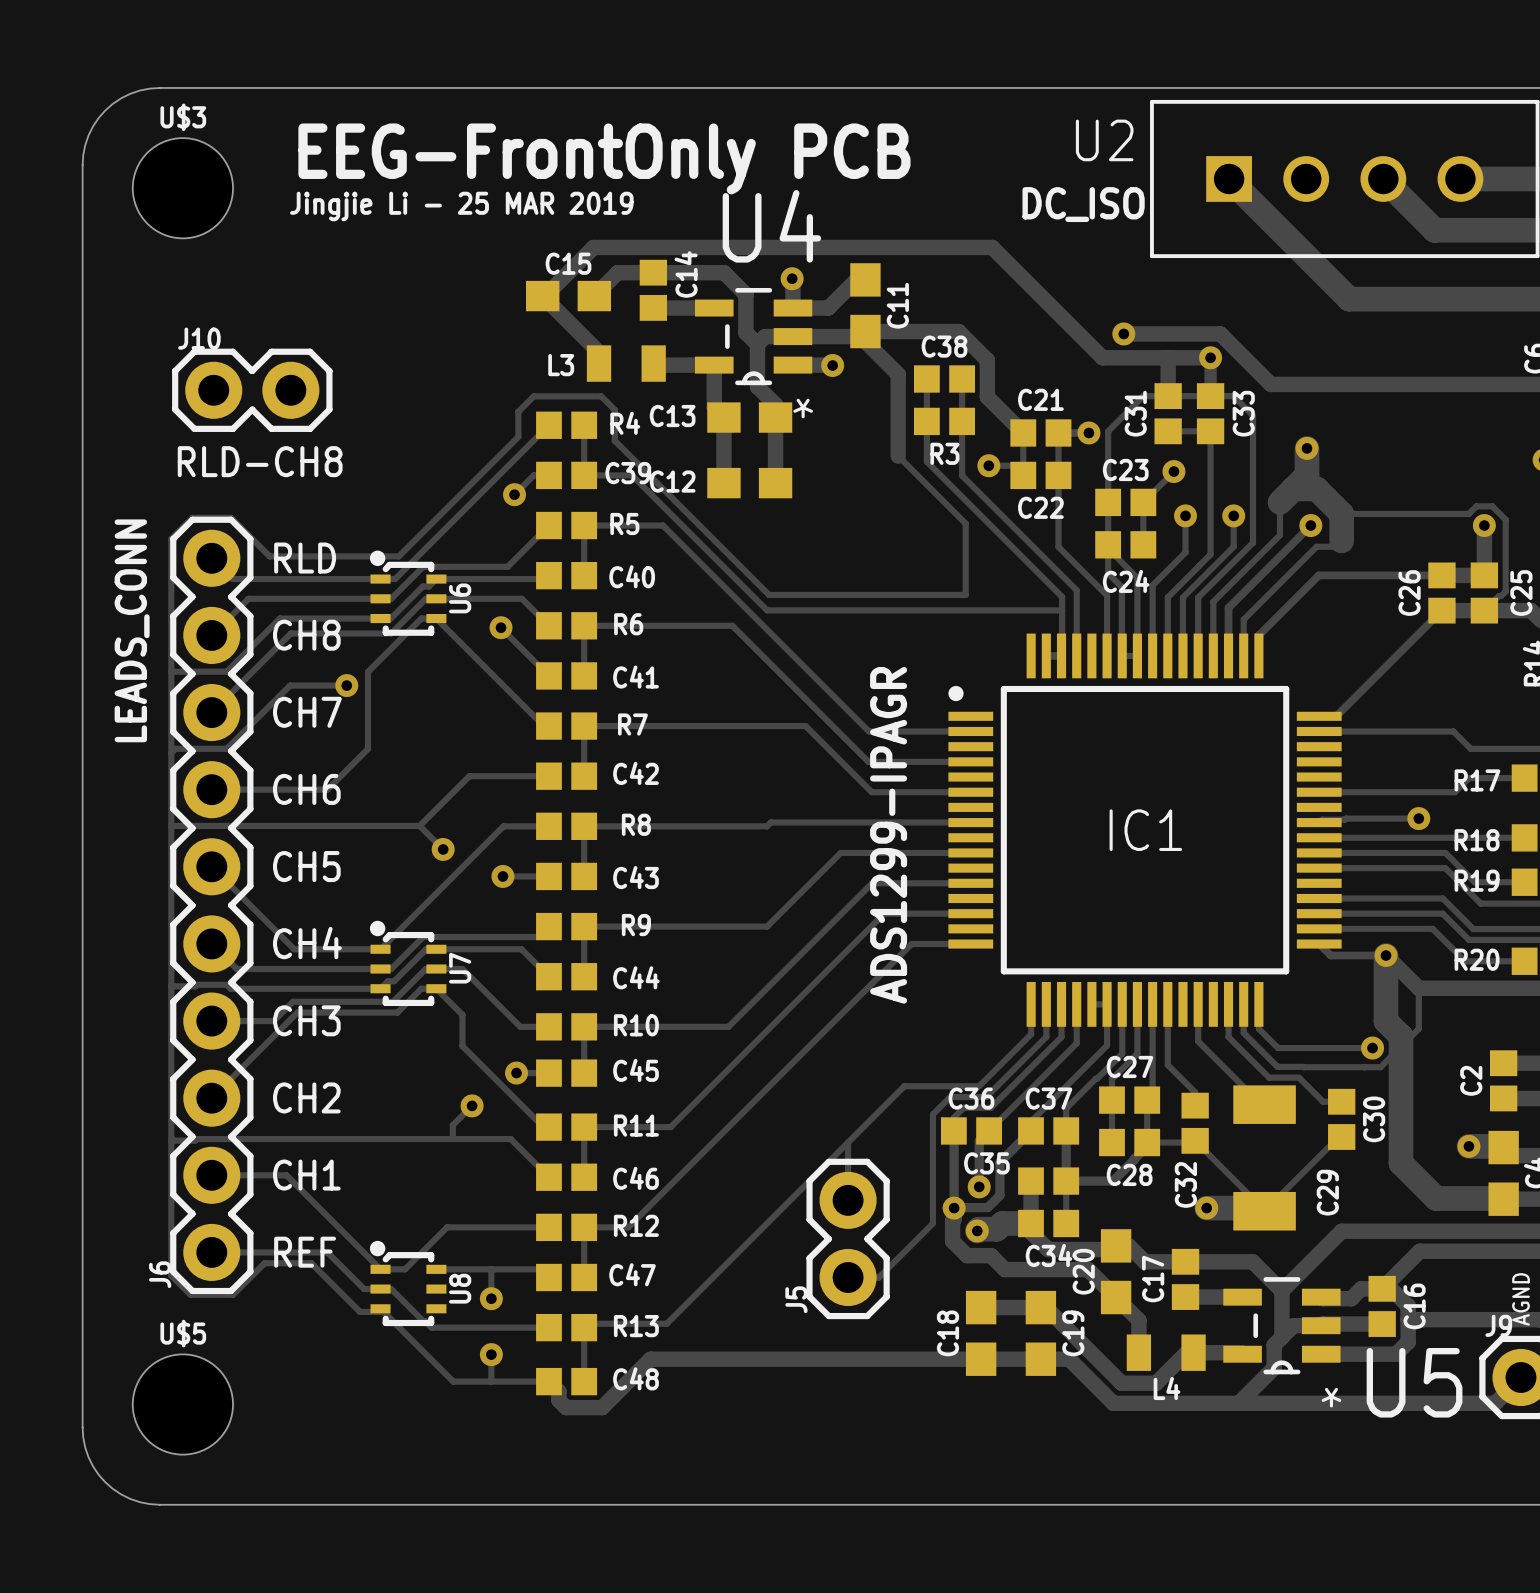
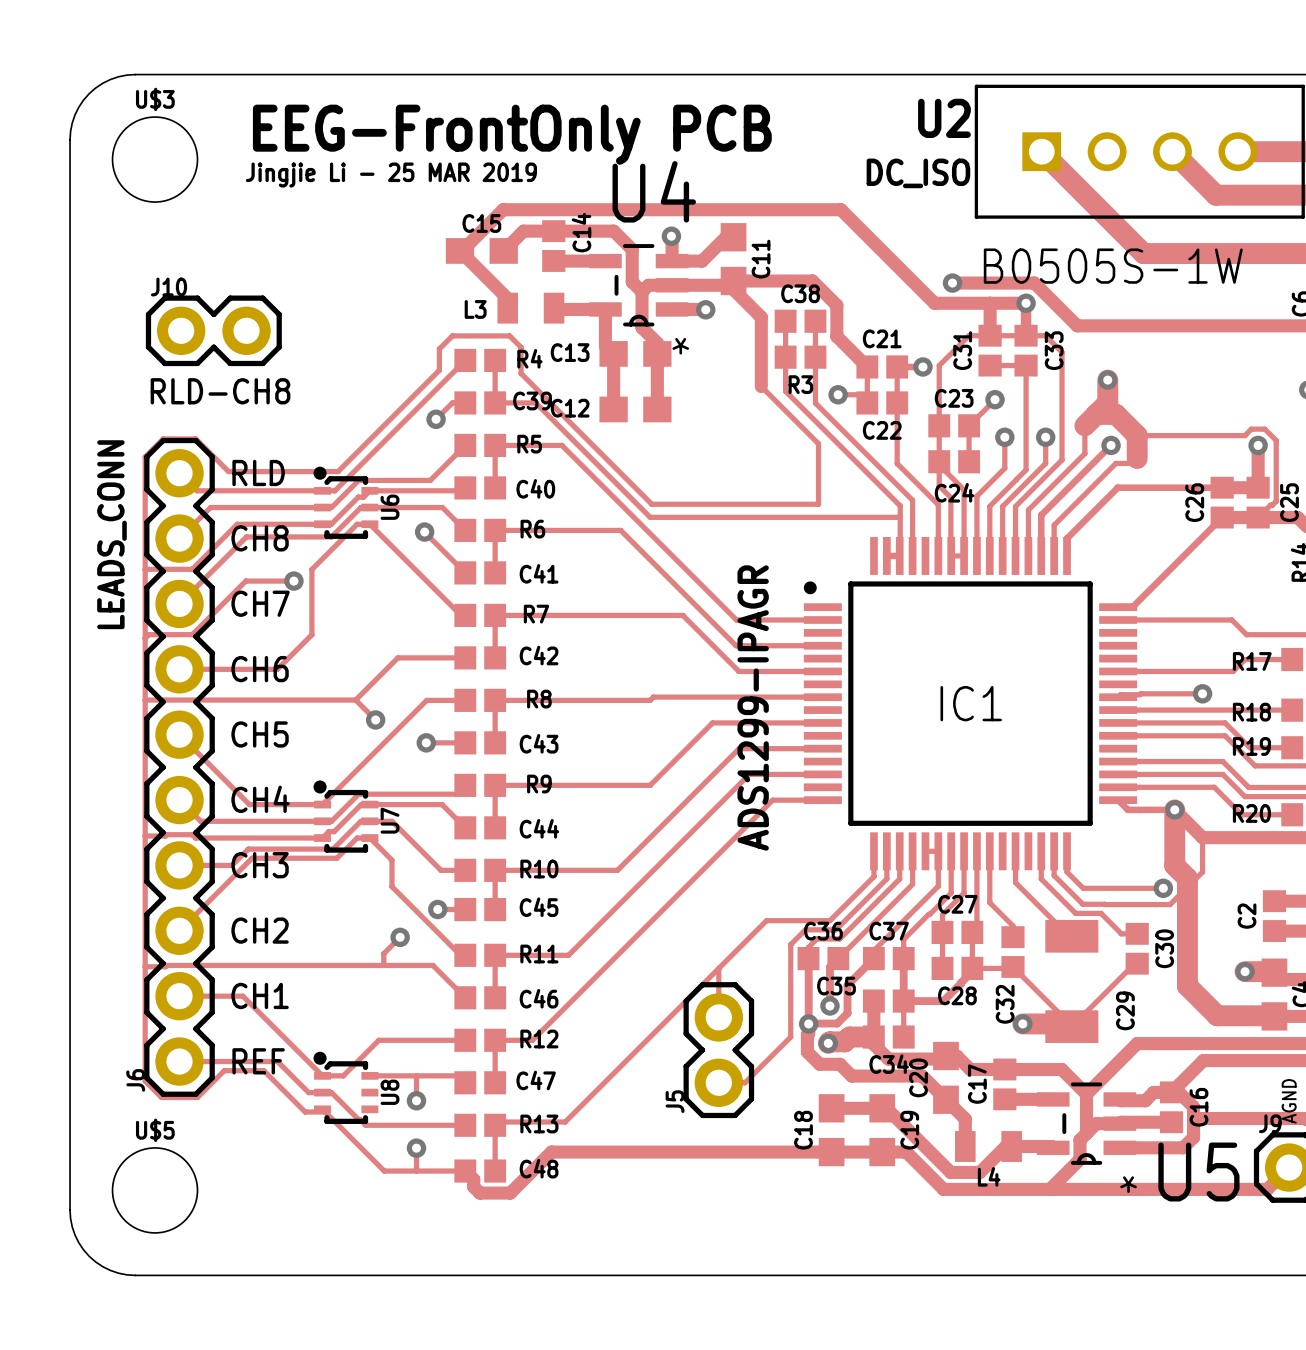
text: none -> U2 (944, 118)
U2 name: U2 (1104, 140) -> none
U2 text: none -> B0505S-1W (1113, 266)

